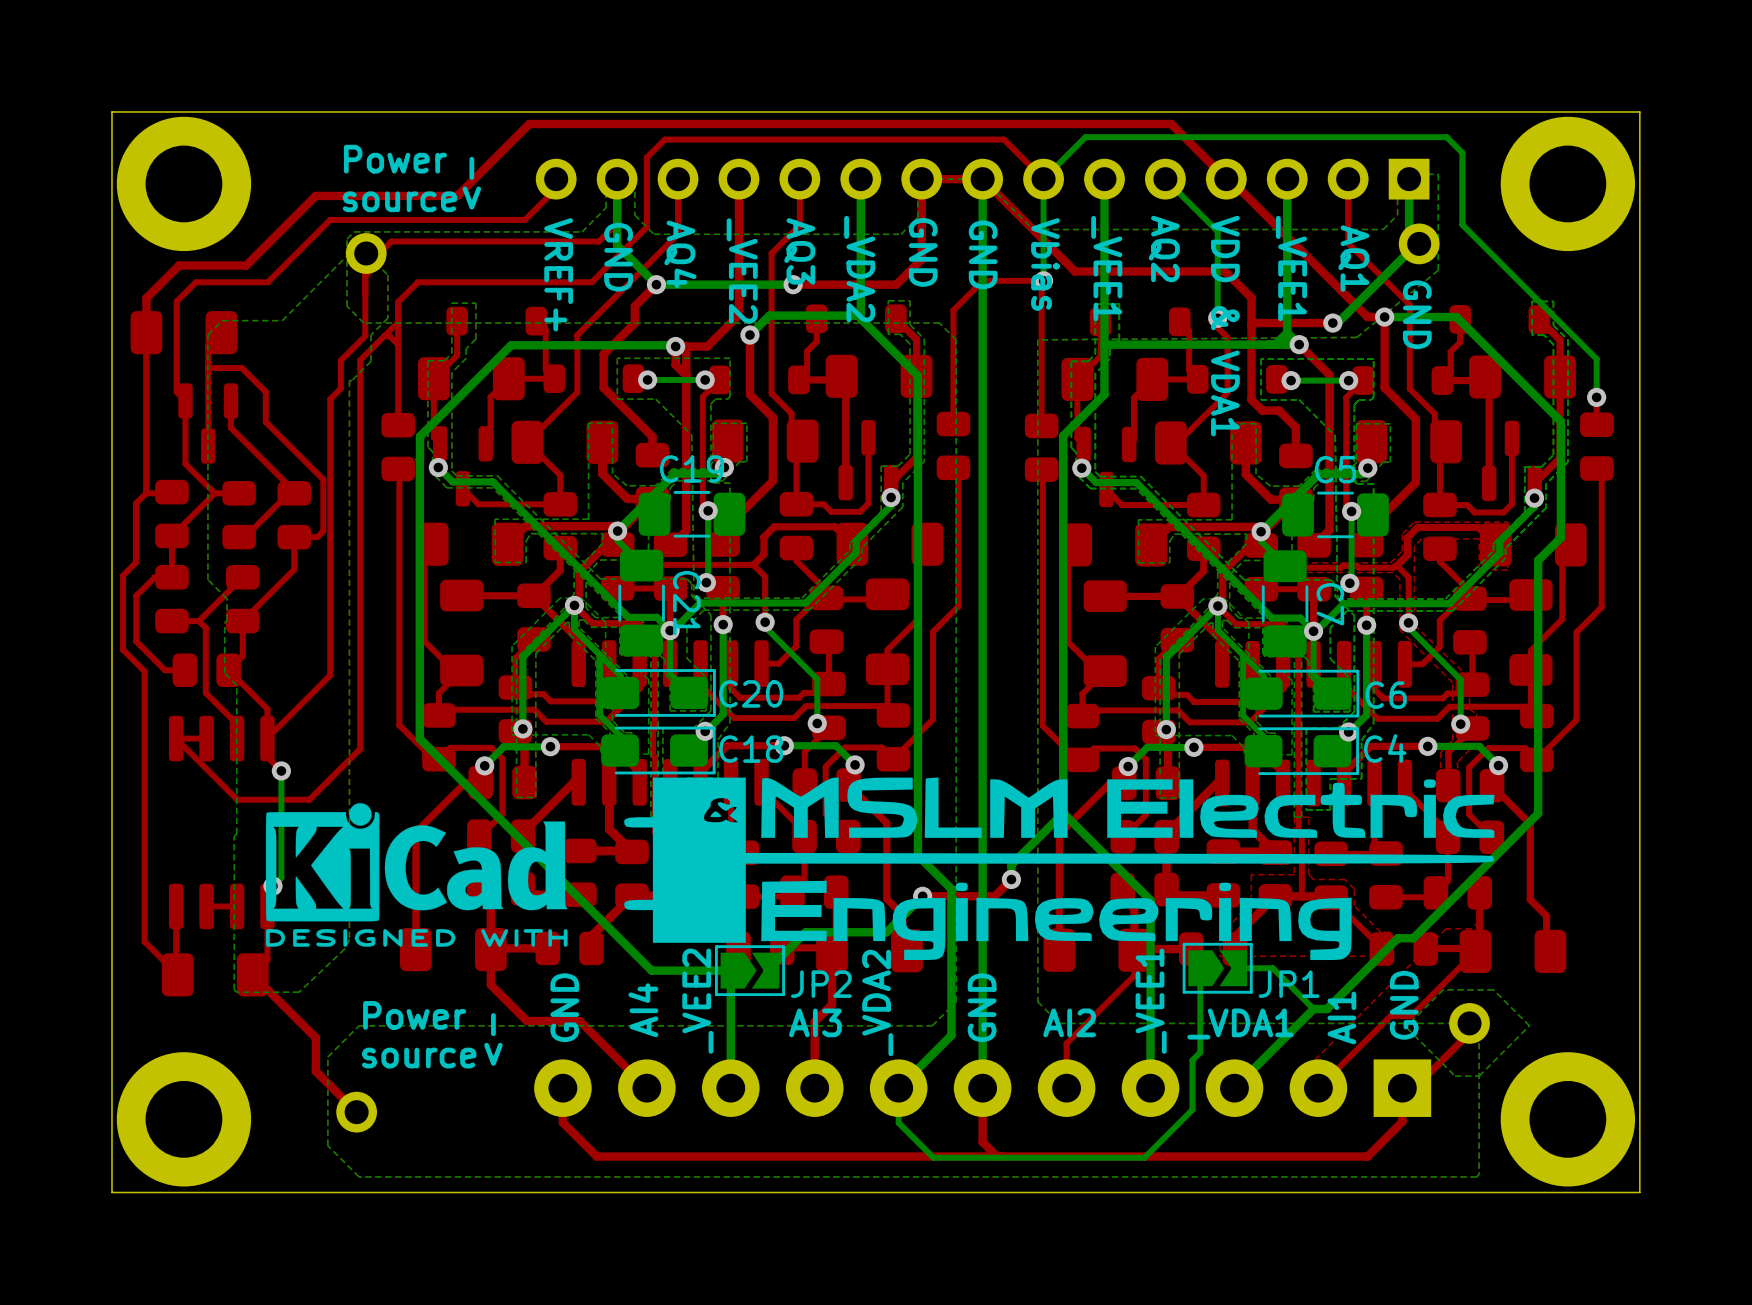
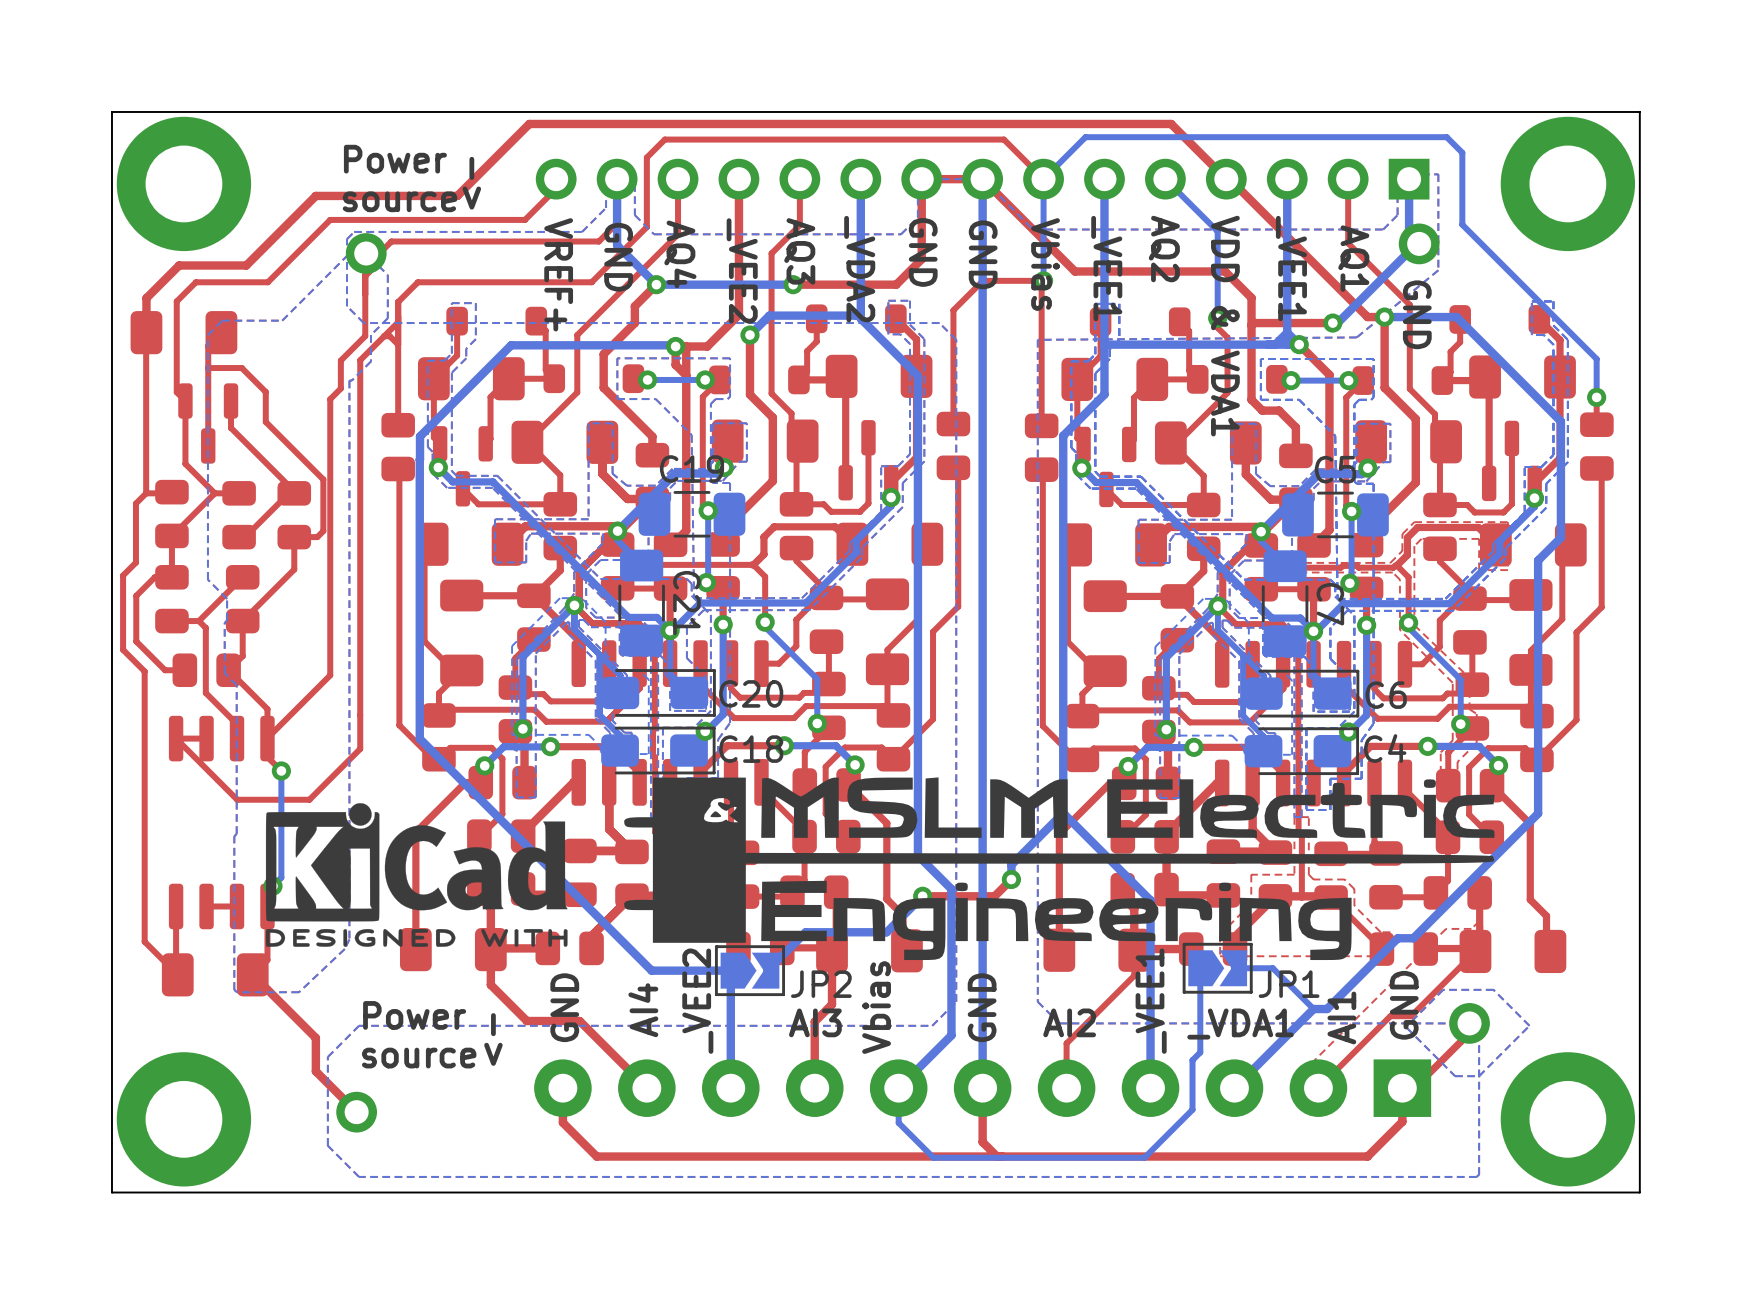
text: _VDA2 (877, 1003) -> Vbias (876, 1007)

